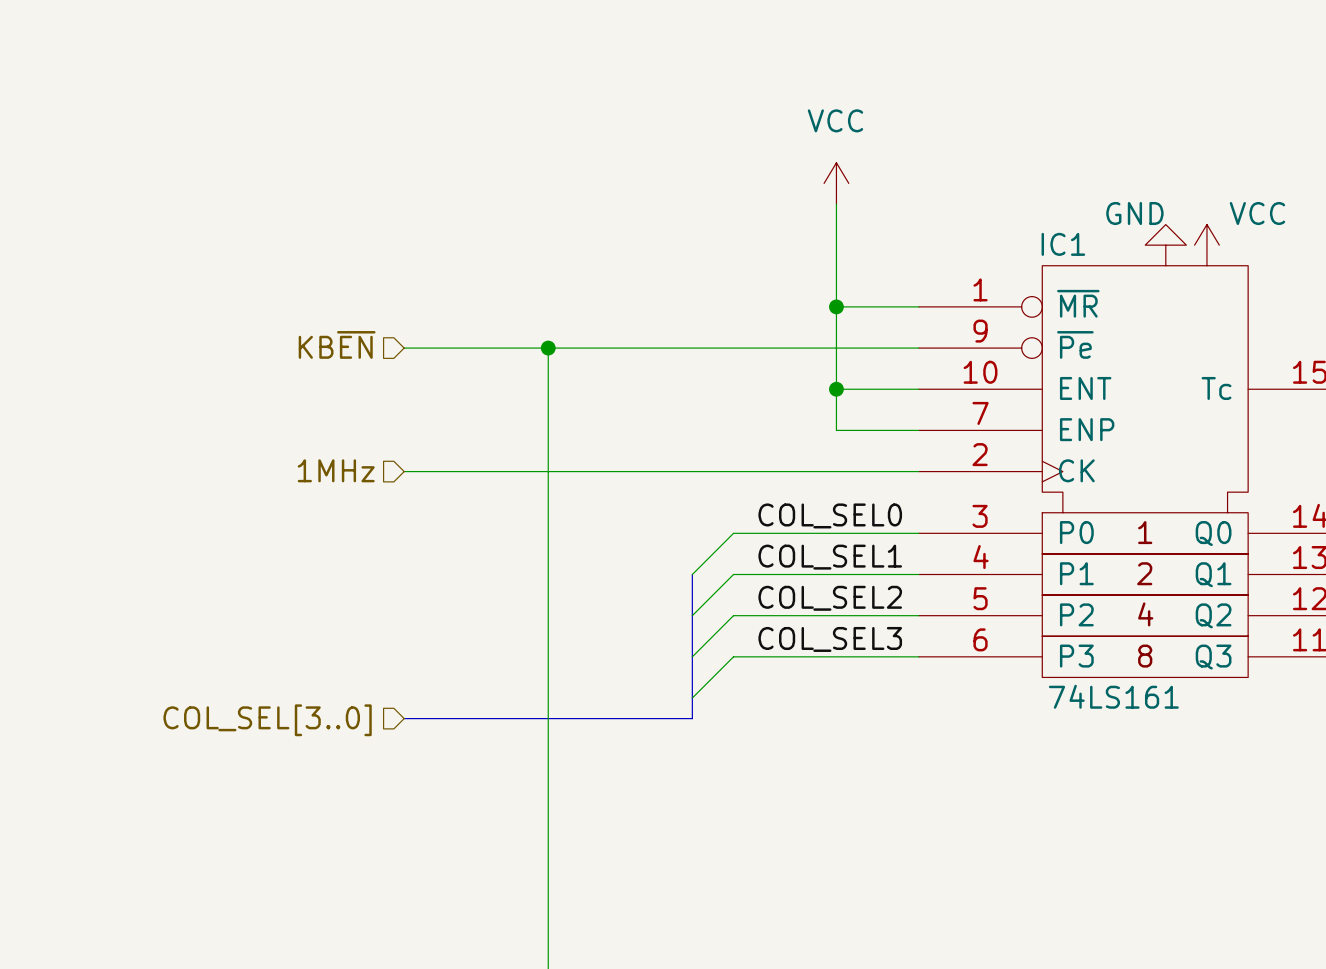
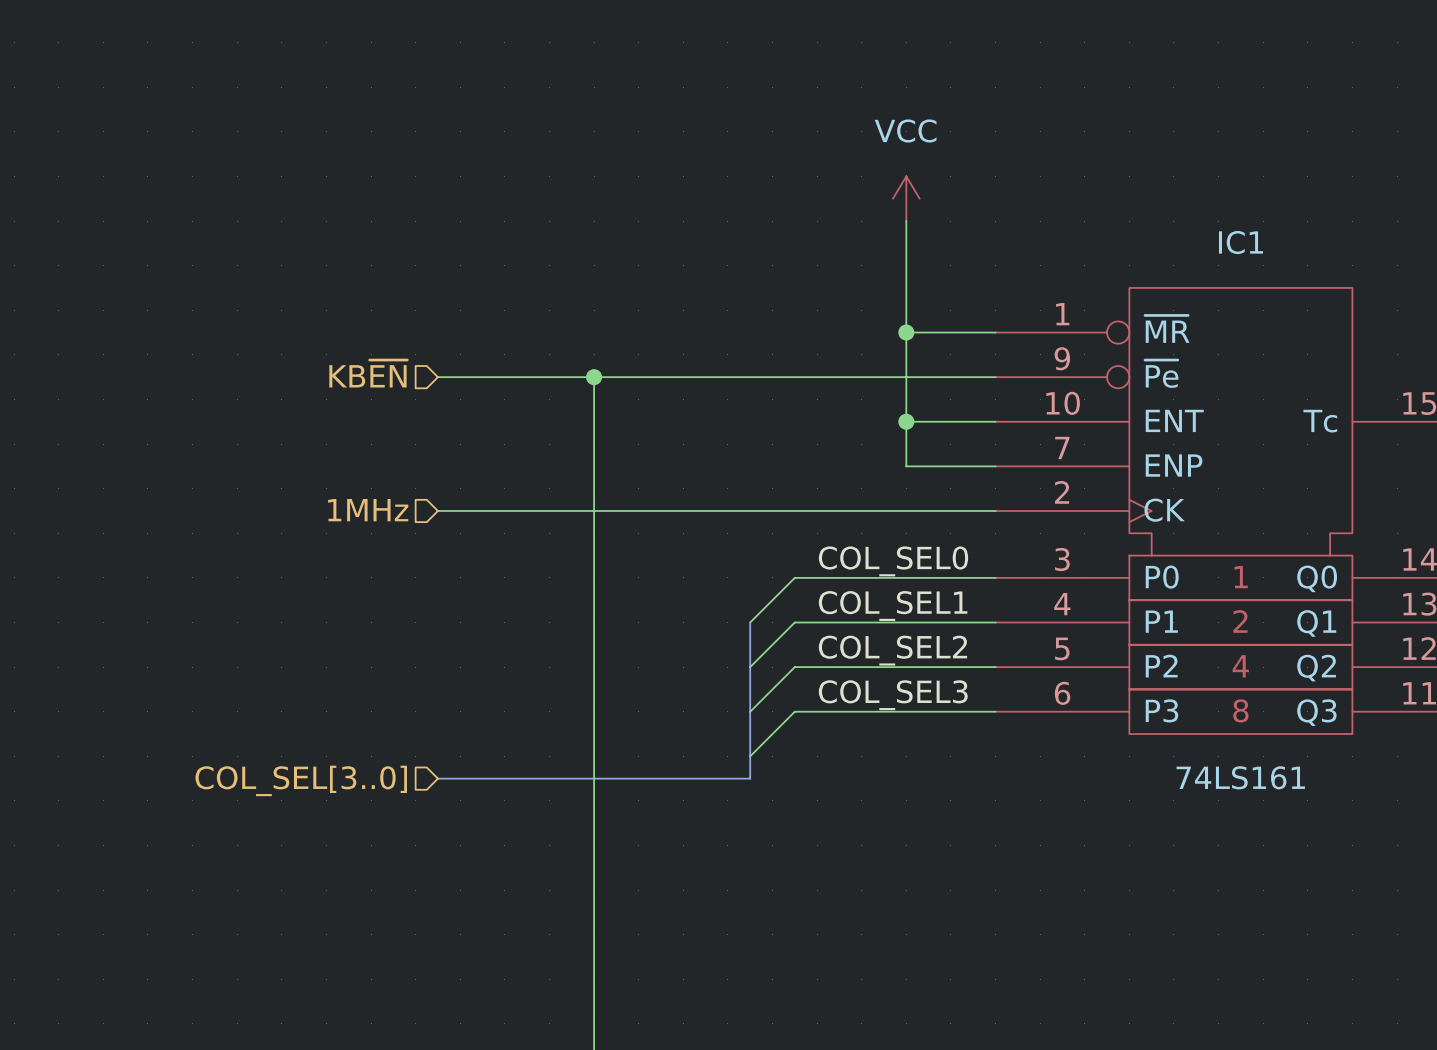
IC1 name position: IC1 (1063, 244) -> IC1 (1240, 242)
power symbol: GND (1165, 245) -> none
power symbol: VCC (1206, 245) -> none
IC1 value position: 74LS161 (1113, 696) -> 74LS161 (1240, 777)

